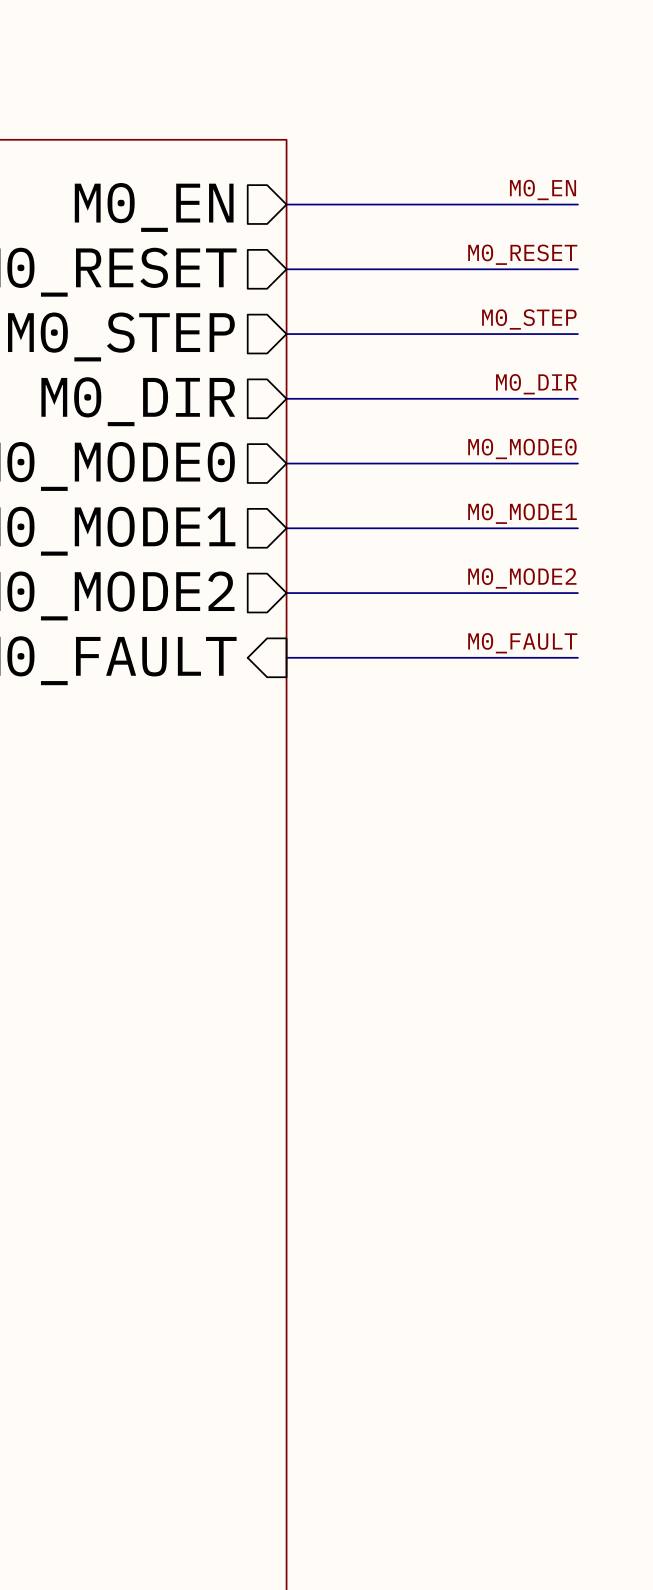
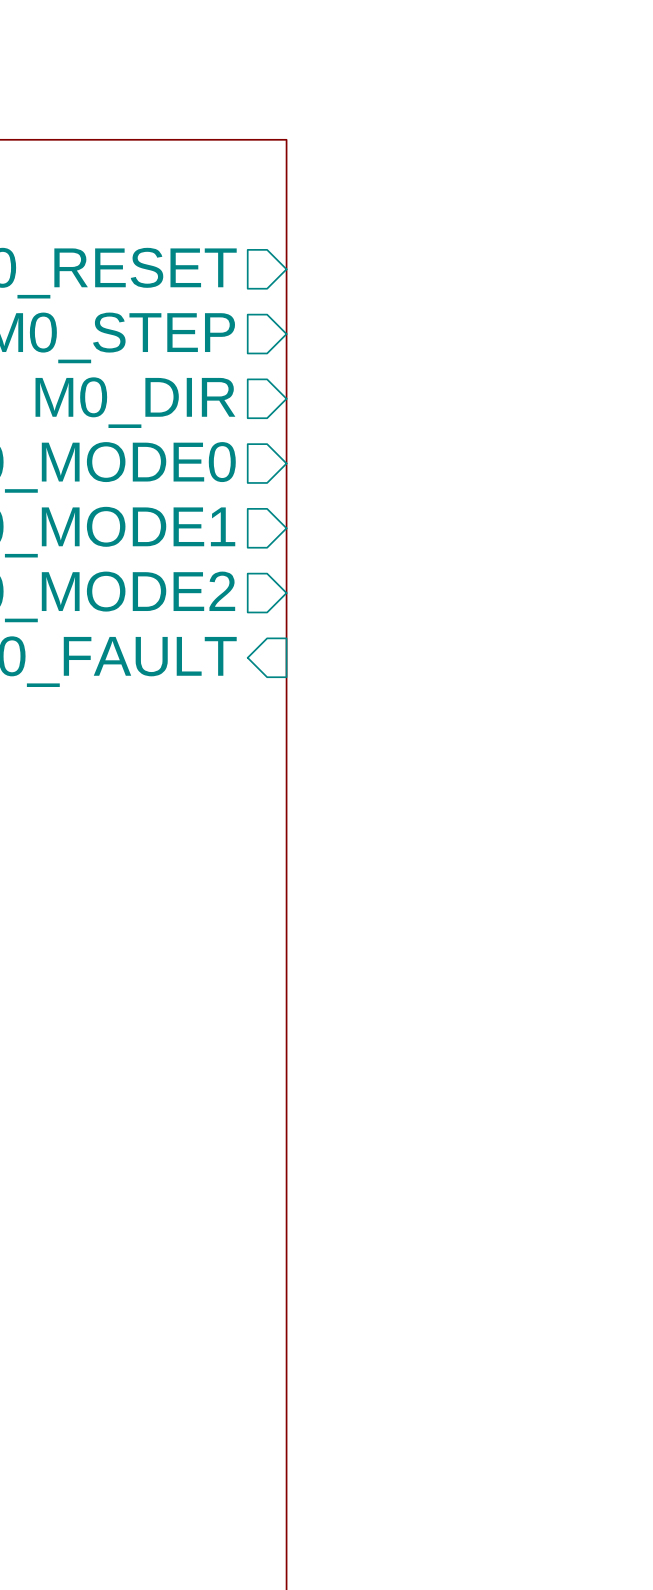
label: M0_EN (543, 189) -> none
wire: (286, 204) (577, 204) -> none
sheet pin: M0_EN (154, 207) -> none
label: M0_RESET (522, 254) -> none
wire: (286, 269) (577, 269) -> none
label: M0_STEP (529, 319) -> none
wire: (286, 334) (577, 334) -> none
label: M0_DIR (536, 384) -> none
wire: (286, 398) (577, 398) -> none
label: M0_MODE0 (522, 448) -> none
wire: (286, 463) (577, 463) -> none
label: M0_MODE1 (522, 513) -> none
wire: (286, 528) (577, 528) -> none
label: M0_MODE2 (522, 578) -> none
wire: (286, 593) (577, 593) -> none
label: M0_FAULT (522, 643) -> none
wire: (286, 657) (577, 657) -> none

